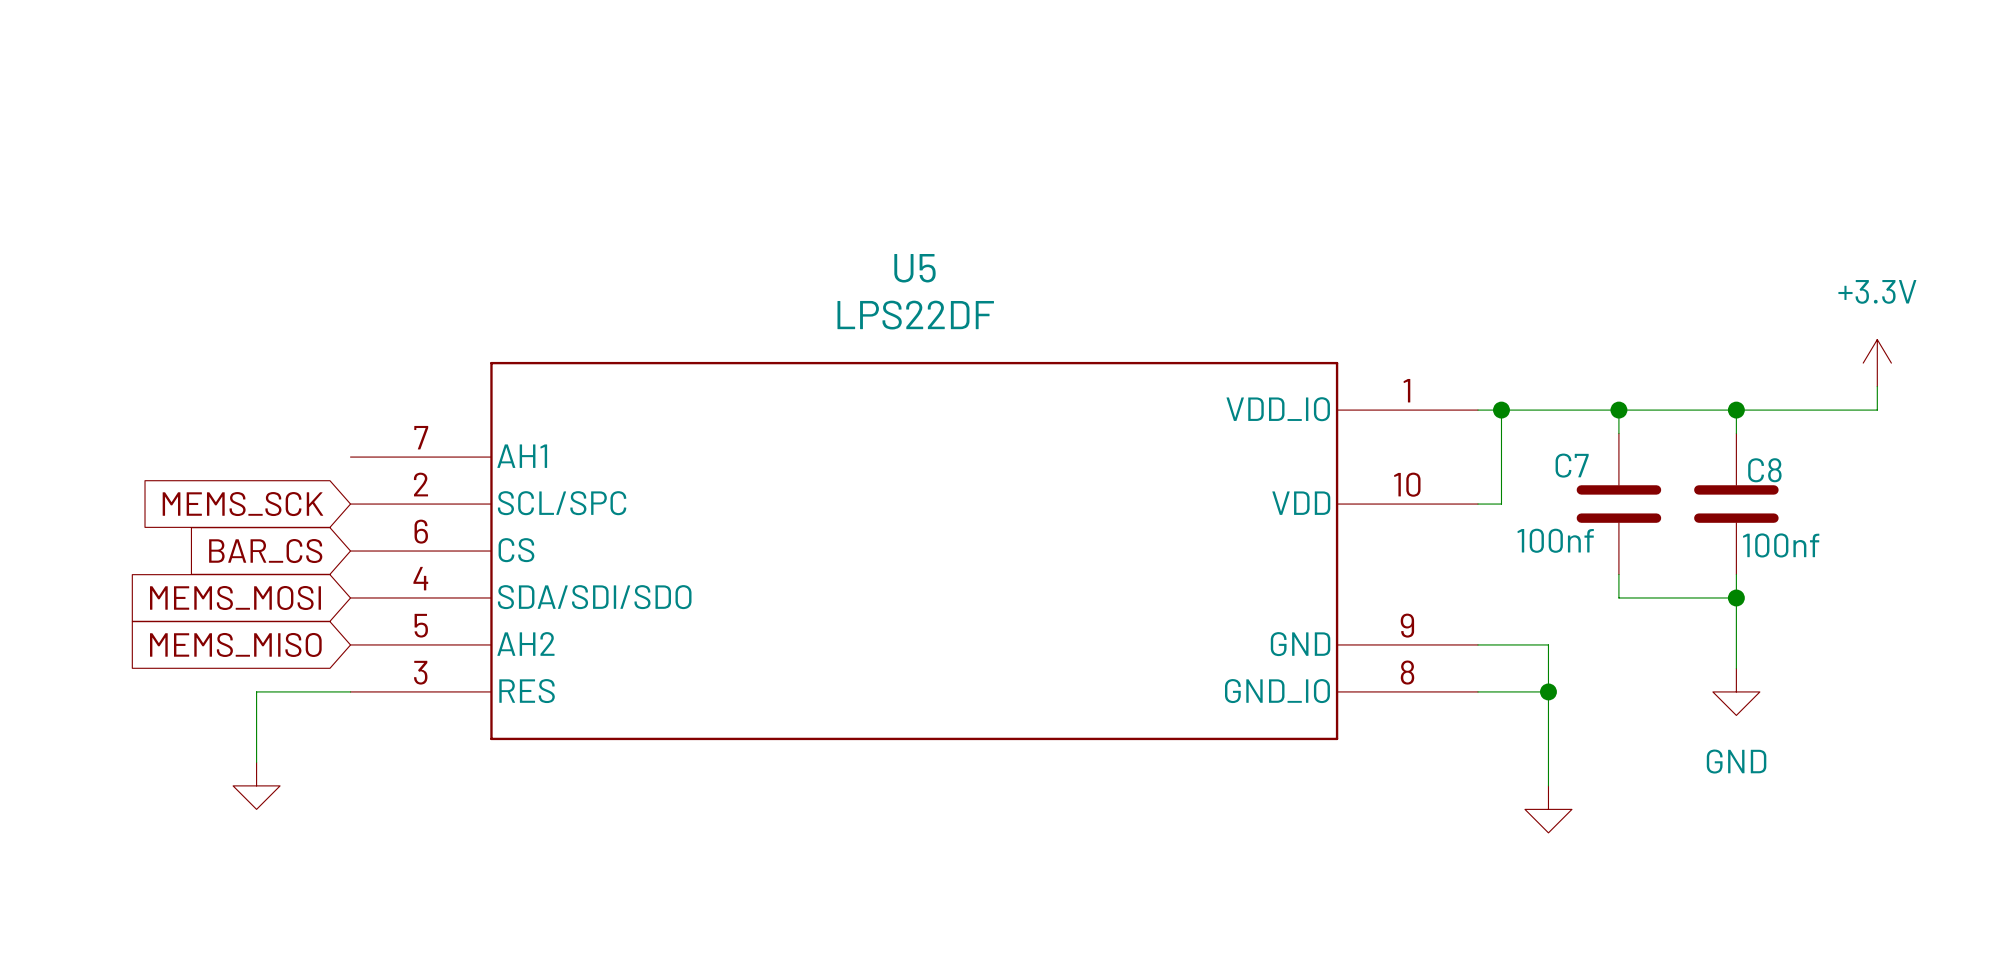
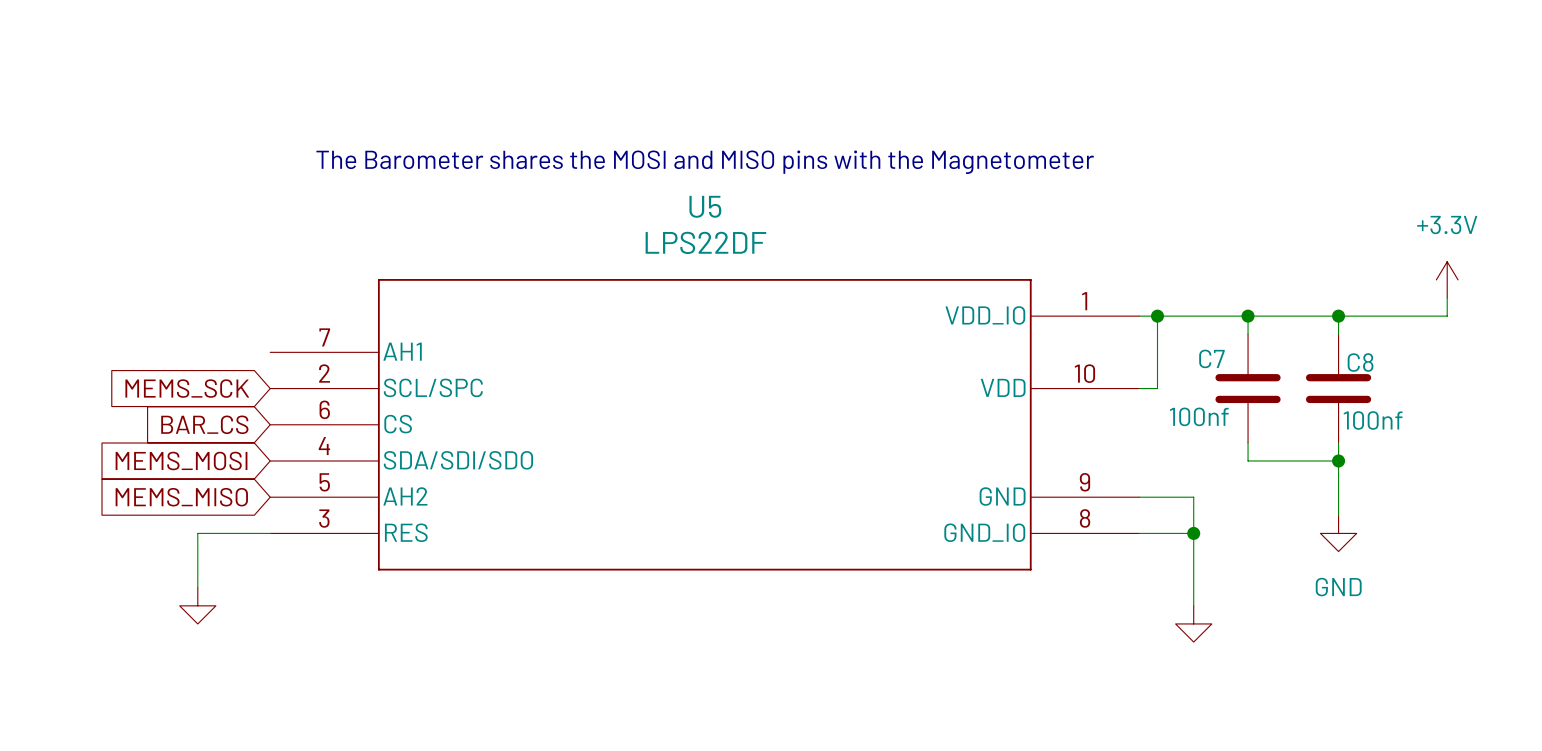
text: none -> The Barometer shares the MOSI and MISO pins with the Magnetometer (705, 162)

